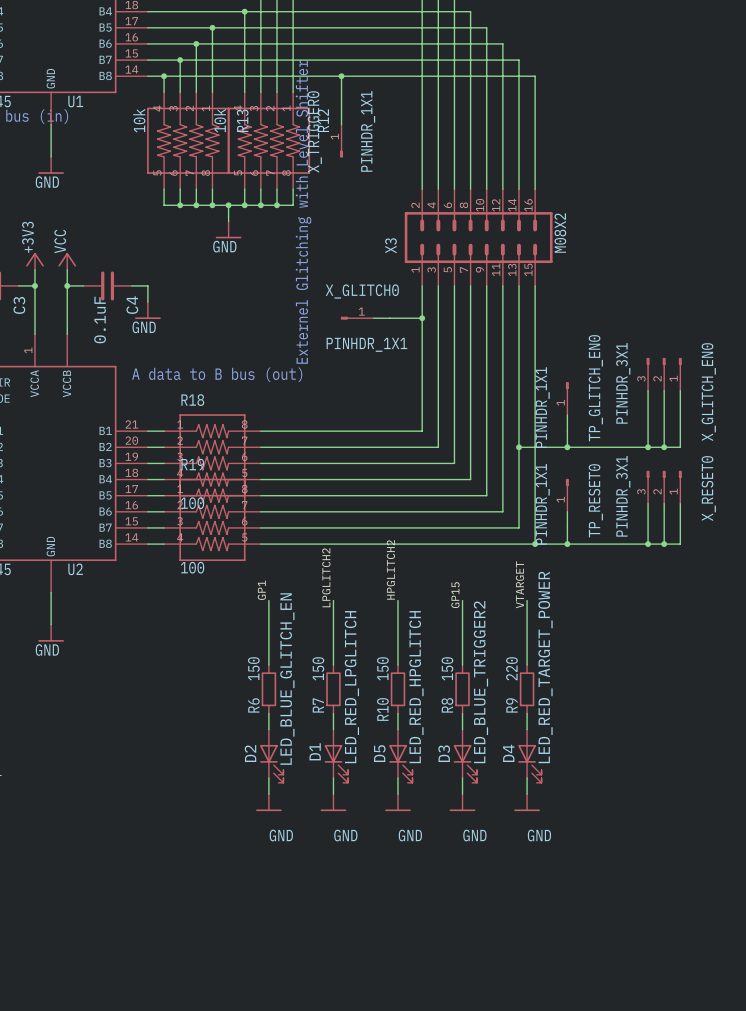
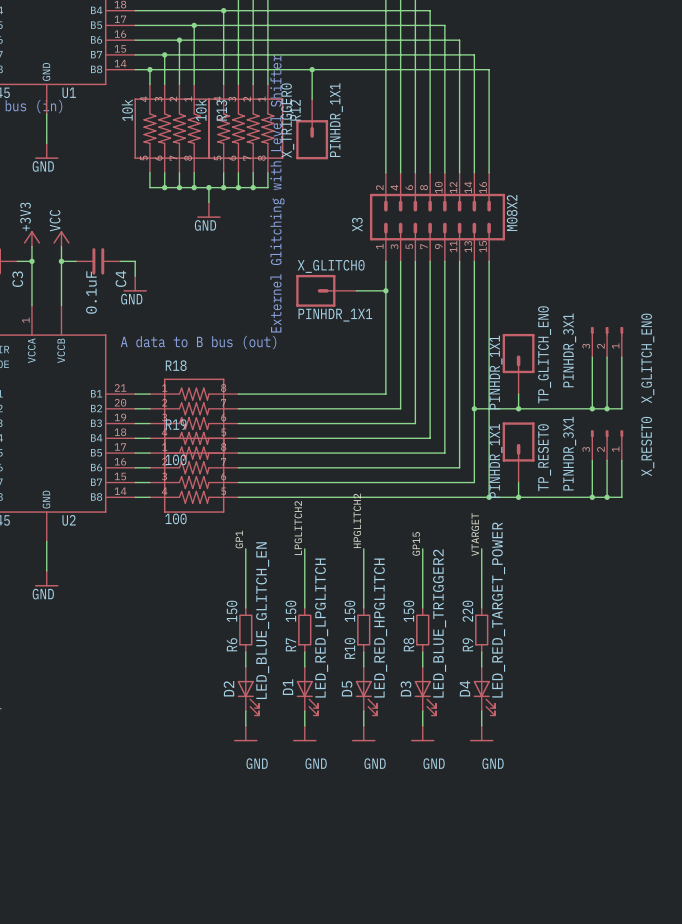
X_TRIGGER0 symbol: [340, 124, 343, 158] -> [296, 99, 329, 160]
X_GLITCH0 symbol: [341, 316, 374, 320] -> [296, 274, 357, 307]
TP_GLITCH_EN0 symbol: [566, 382, 569, 416] -> [502, 333, 535, 395]
TP_RESET0 symbol: [566, 479, 569, 512] -> [502, 422, 535, 483]

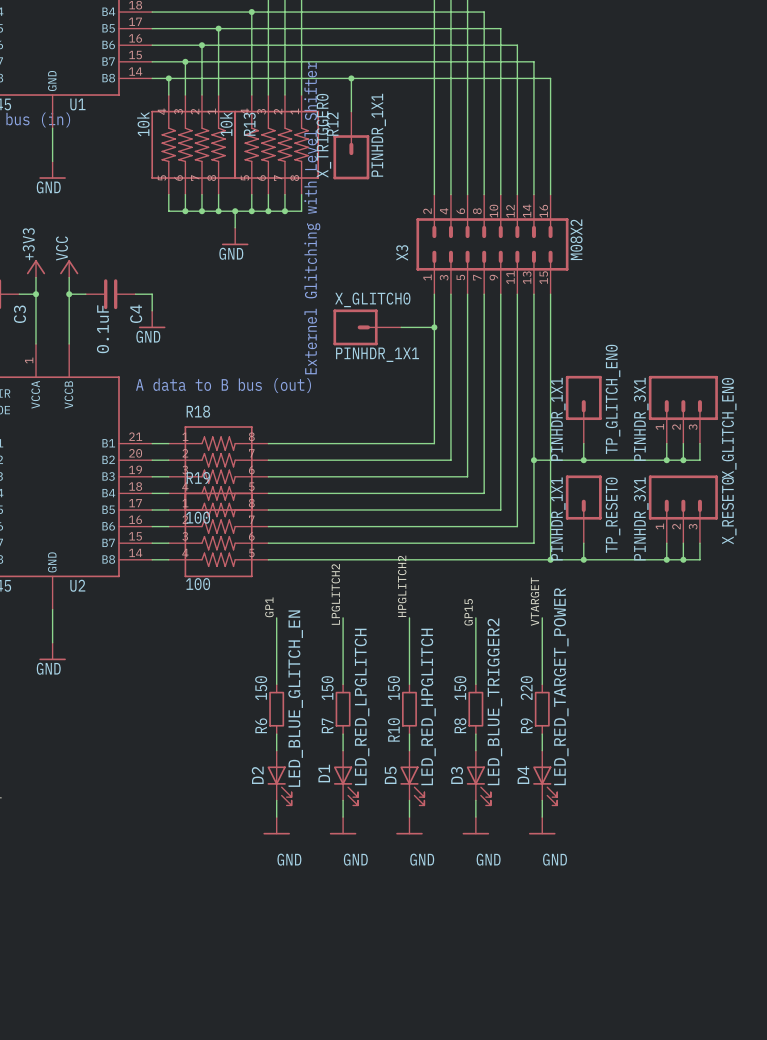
X_GLITCH_EN0 symbol: [591, 327, 623, 358] -> [648, 375, 718, 444]
X_RESET0 symbol: [591, 430, 623, 461] -> [648, 475, 718, 544]

